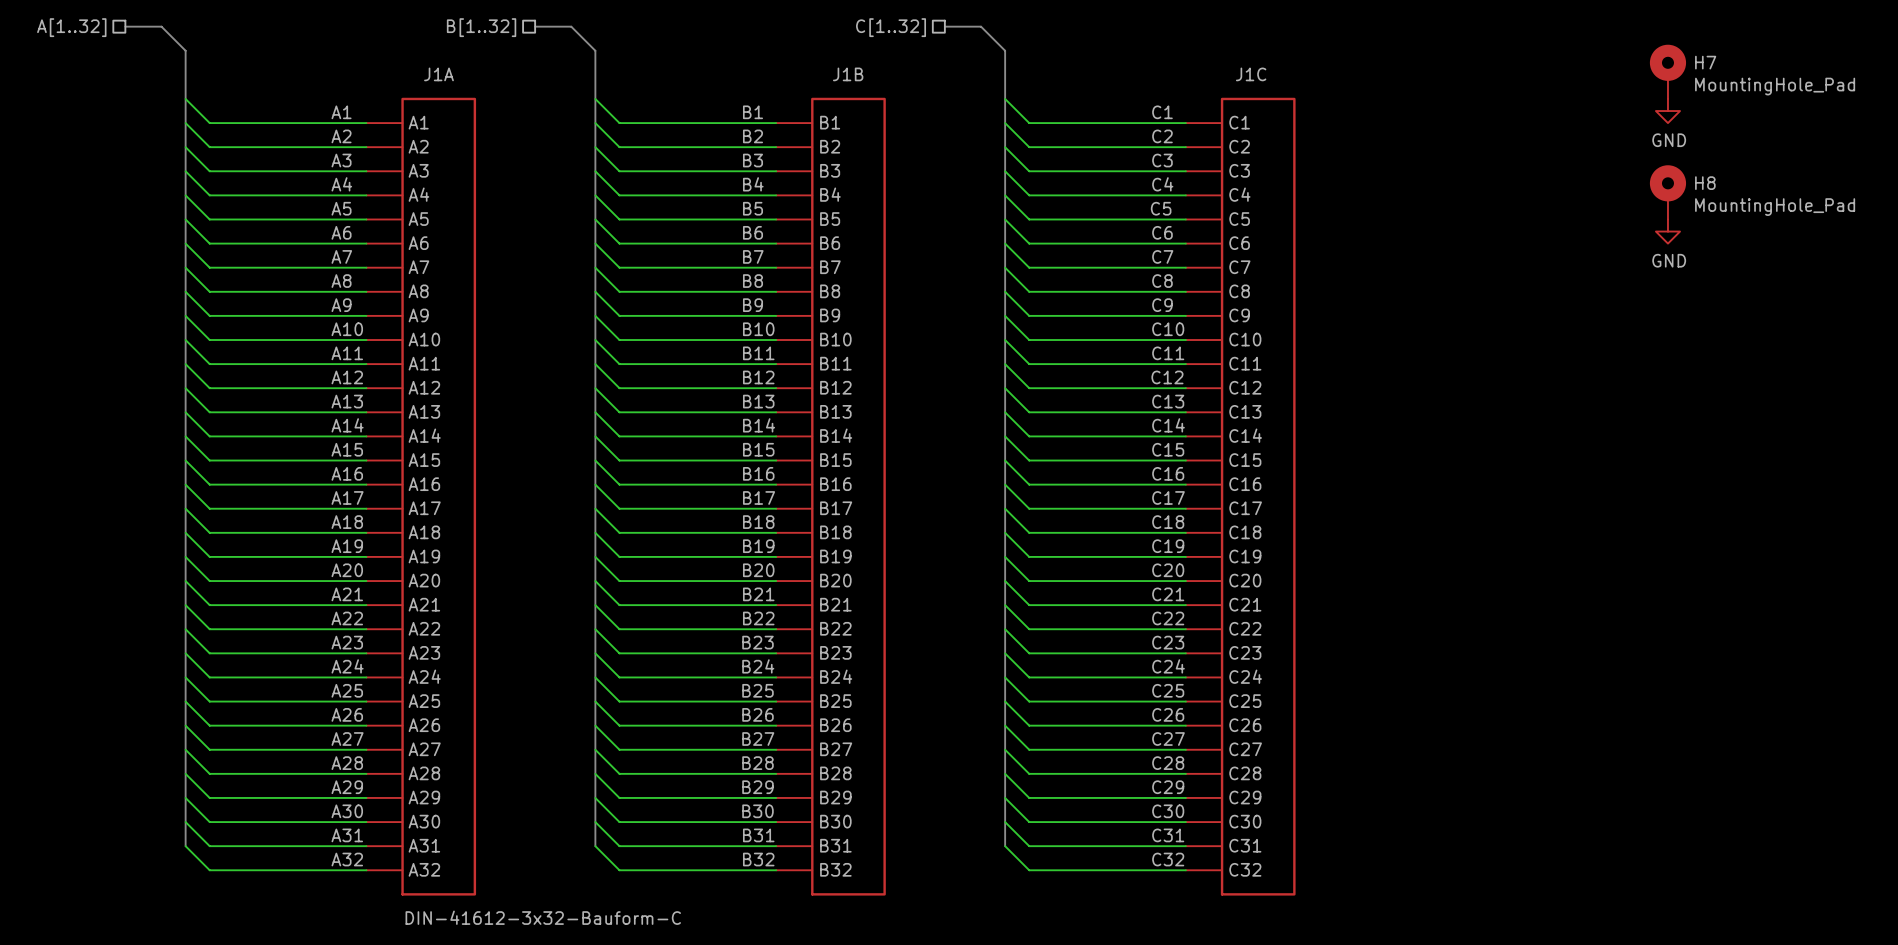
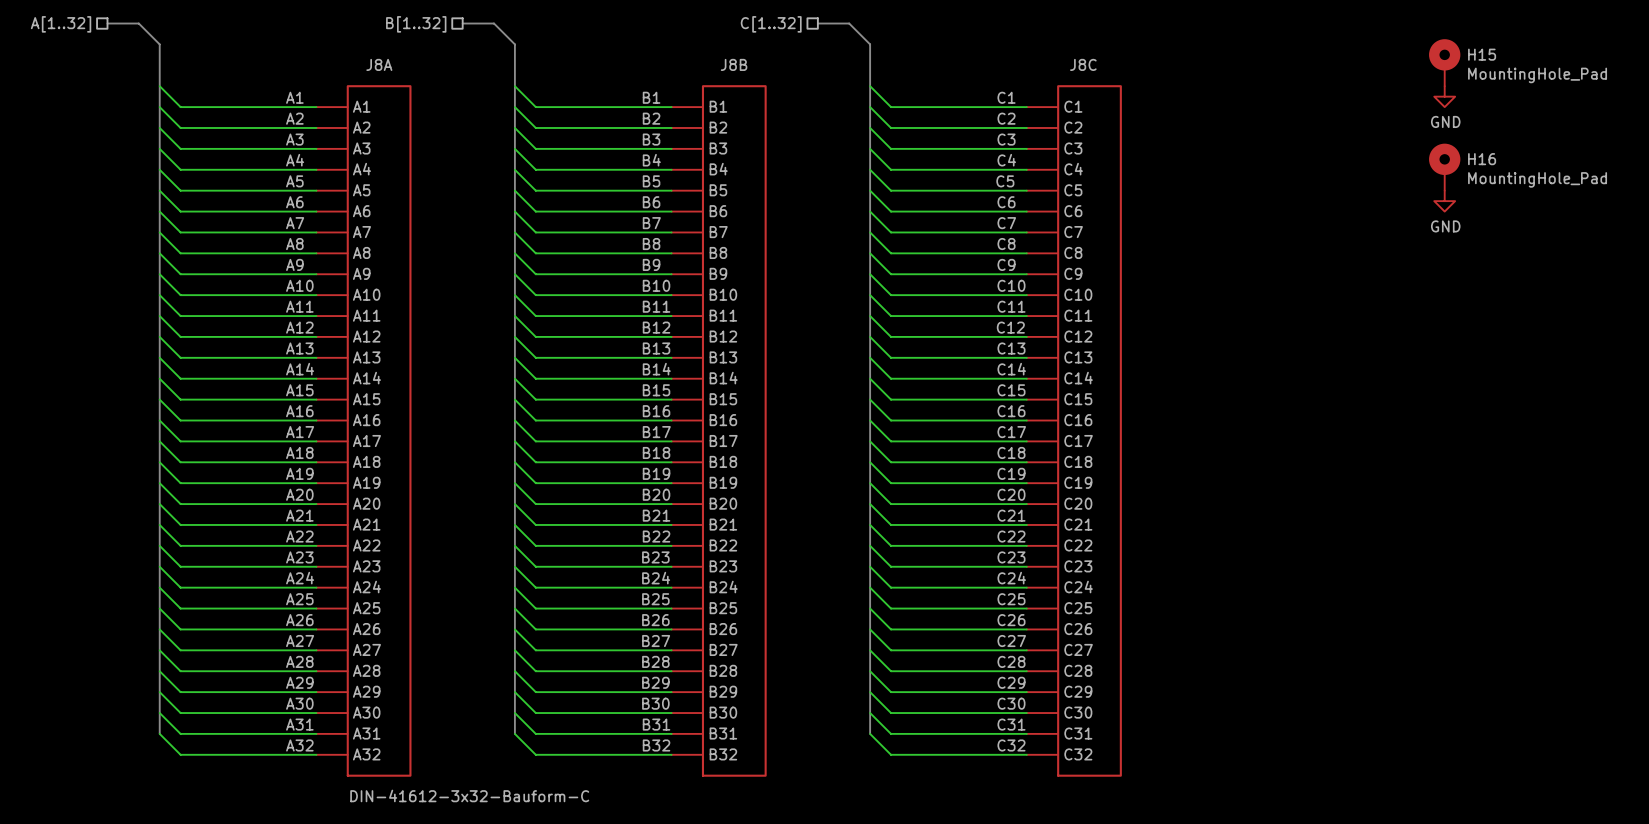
H7 name: H7 (1705, 62) -> H15 (1482, 54)
J1A name: J1A (438, 74) -> J8A (379, 64)
J1B name: J1B (848, 74) -> J8B (734, 64)
J1C name: J1C (1251, 74) -> J8C (1083, 64)
H8 name: H8 (1705, 183) -> H16 (1482, 159)

